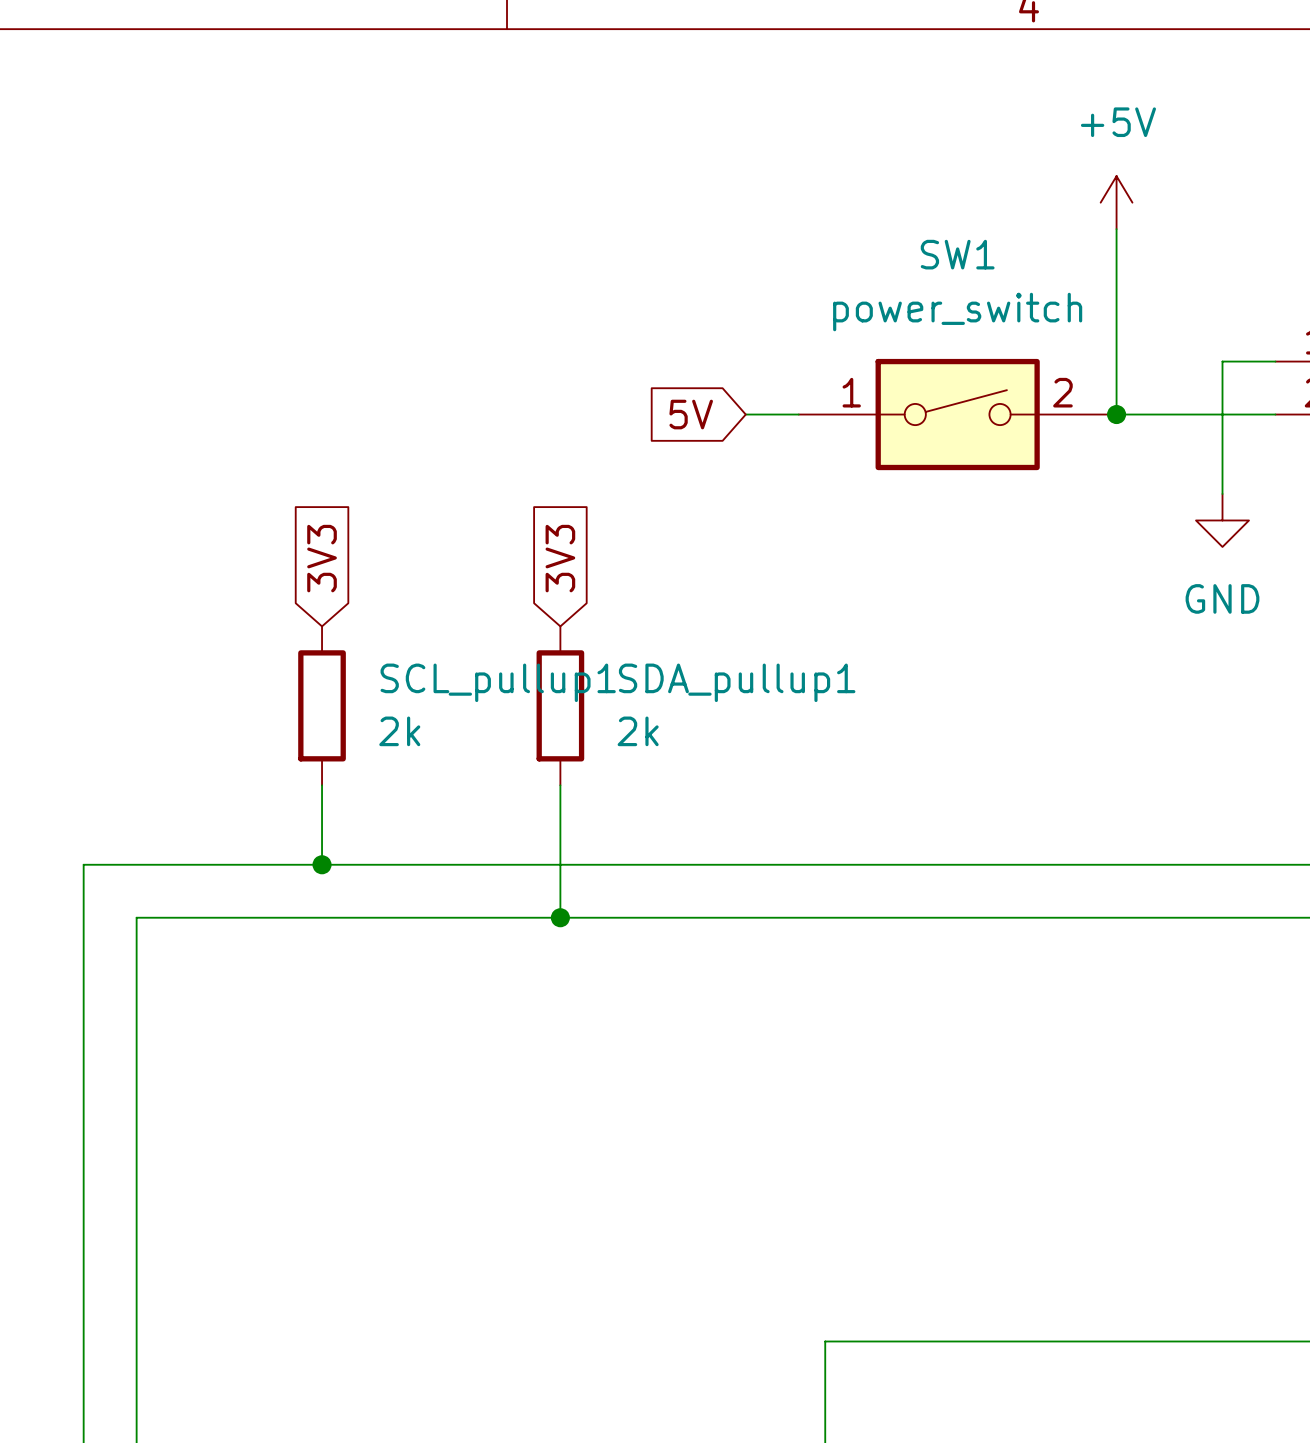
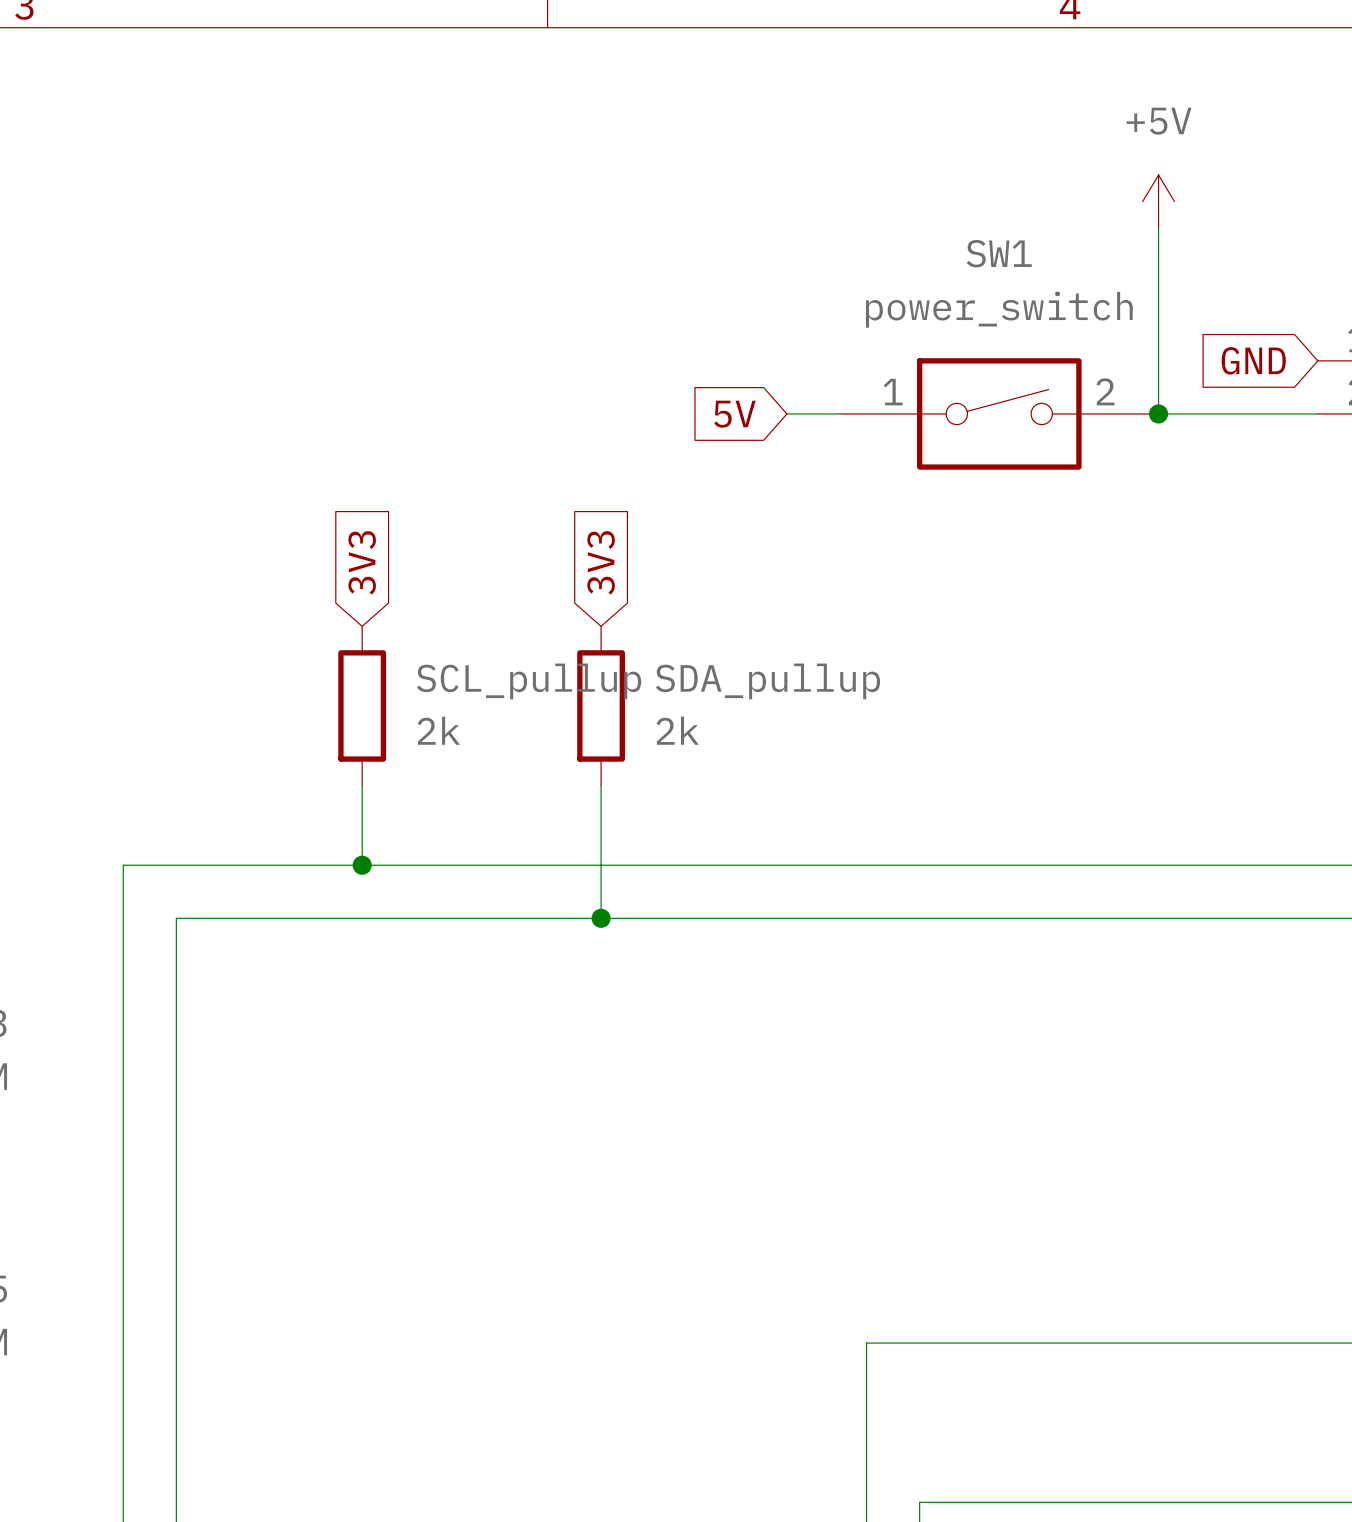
global label: none -> GND (1253, 360)
wire: (1275, 361) (1222, 361) (1222, 493) -> none
power symbol: GND (1222, 520) -> none
SCL_pullup1 name: SCL_pullup1 (498, 682) -> SCL_pullup (529, 681)
SDA_pullup1 name: SDA_pullup1 (737, 682) -> SDA_pullup (767, 681)

